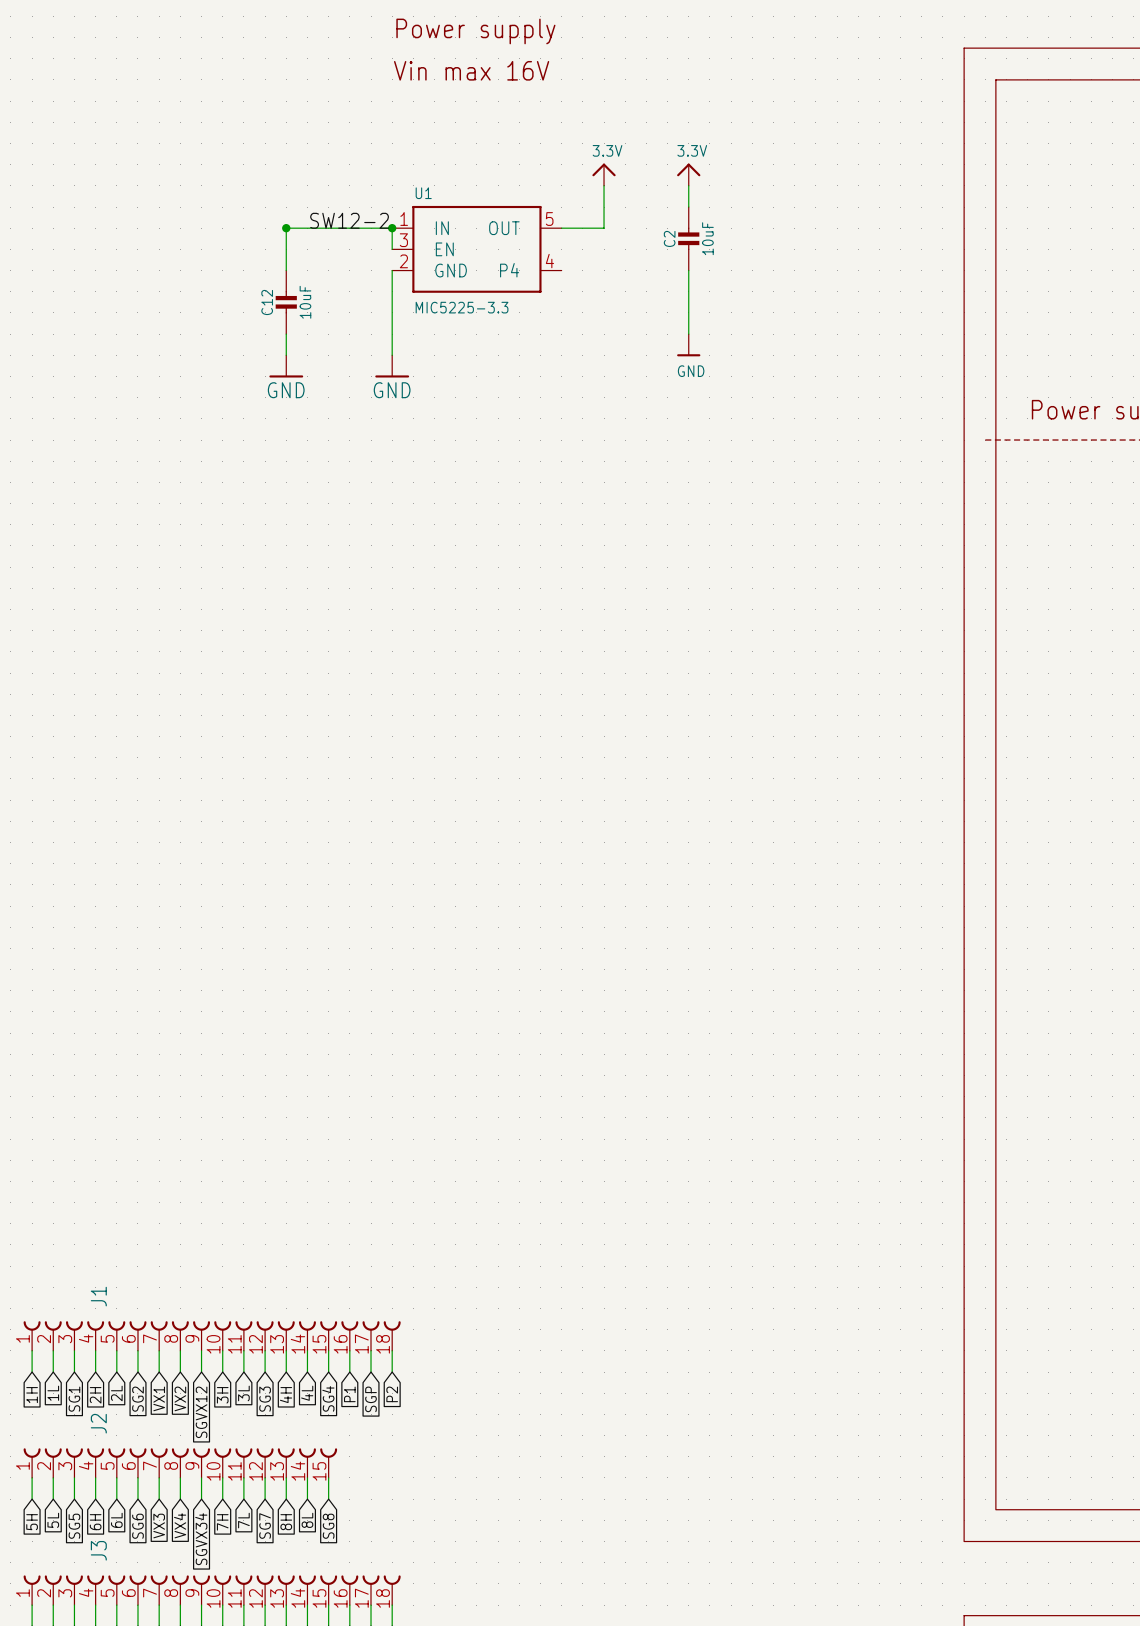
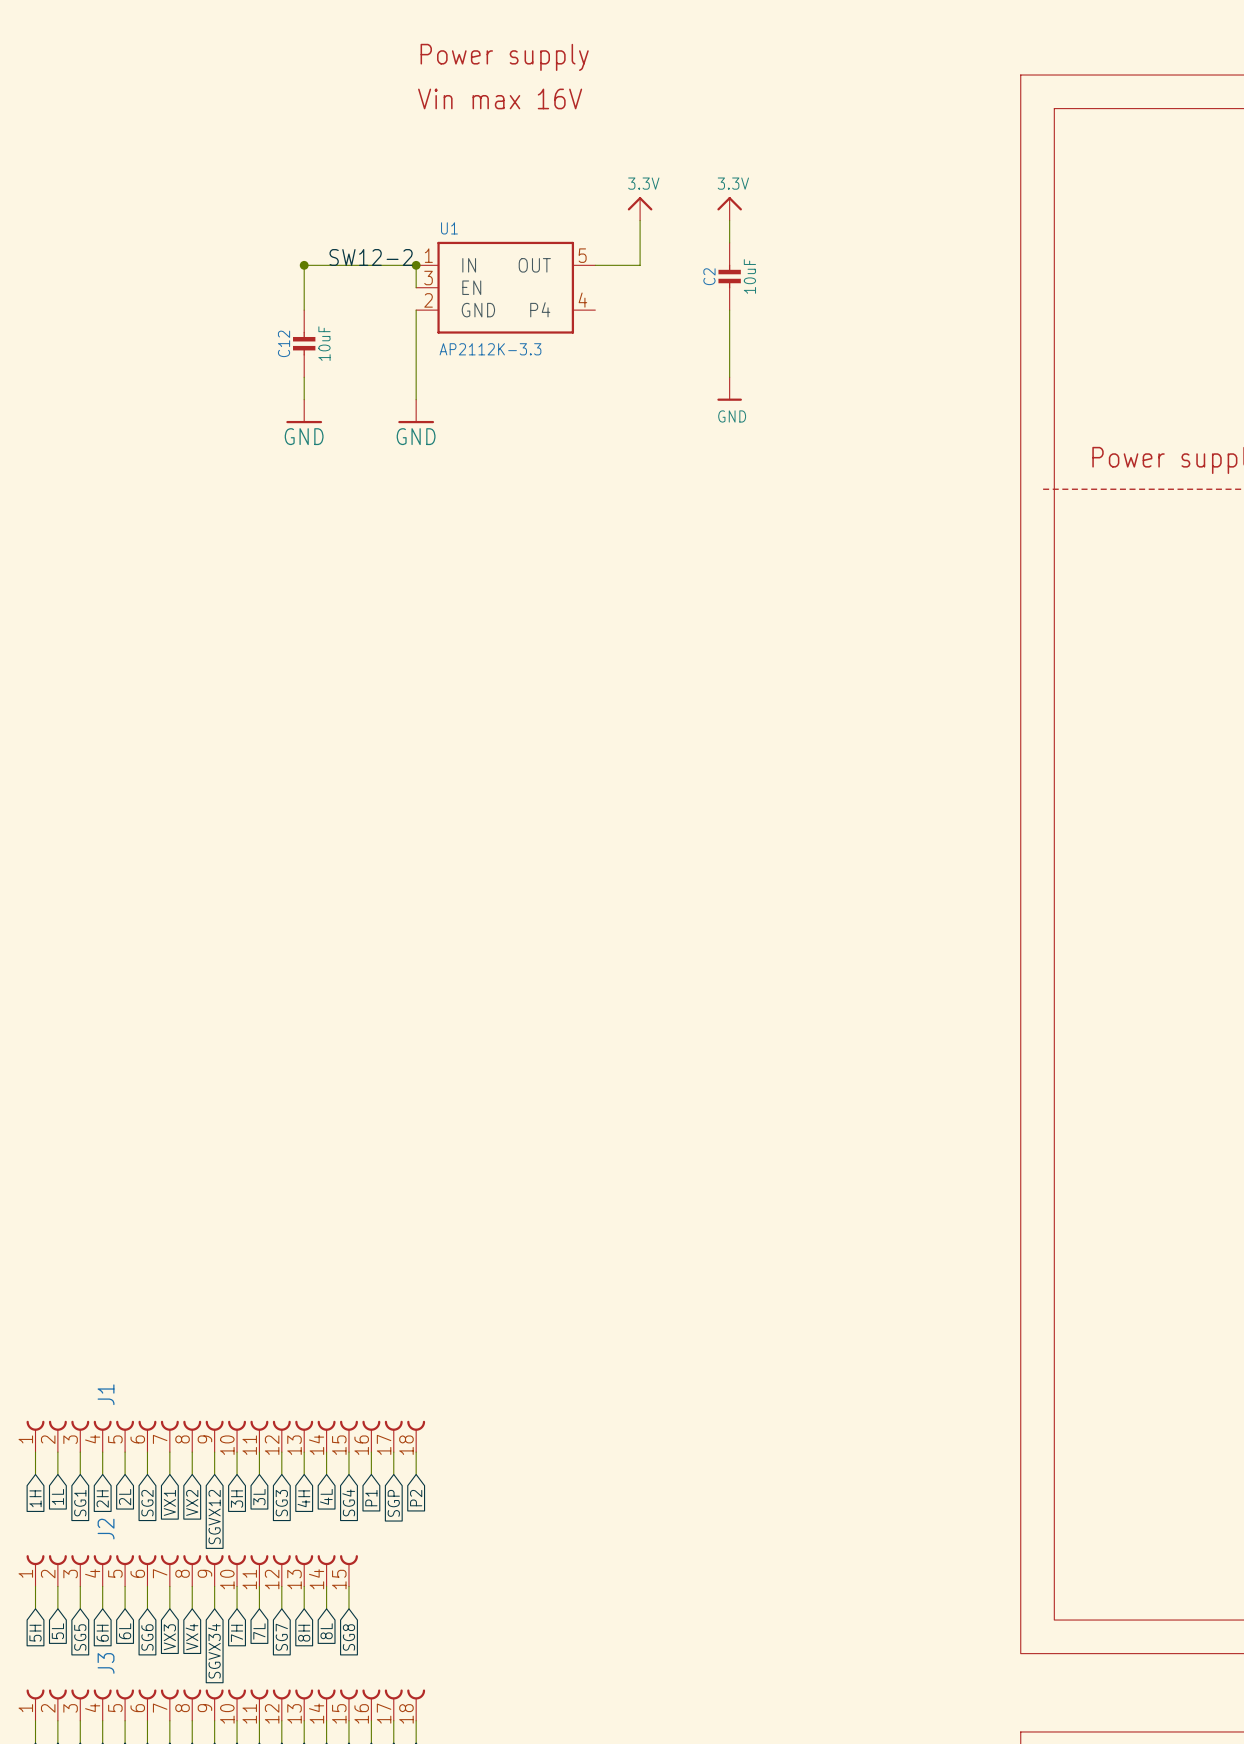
U1 value: MIC5225-3.3 (462, 307) -> AP2112K-3.3 (490, 349)

